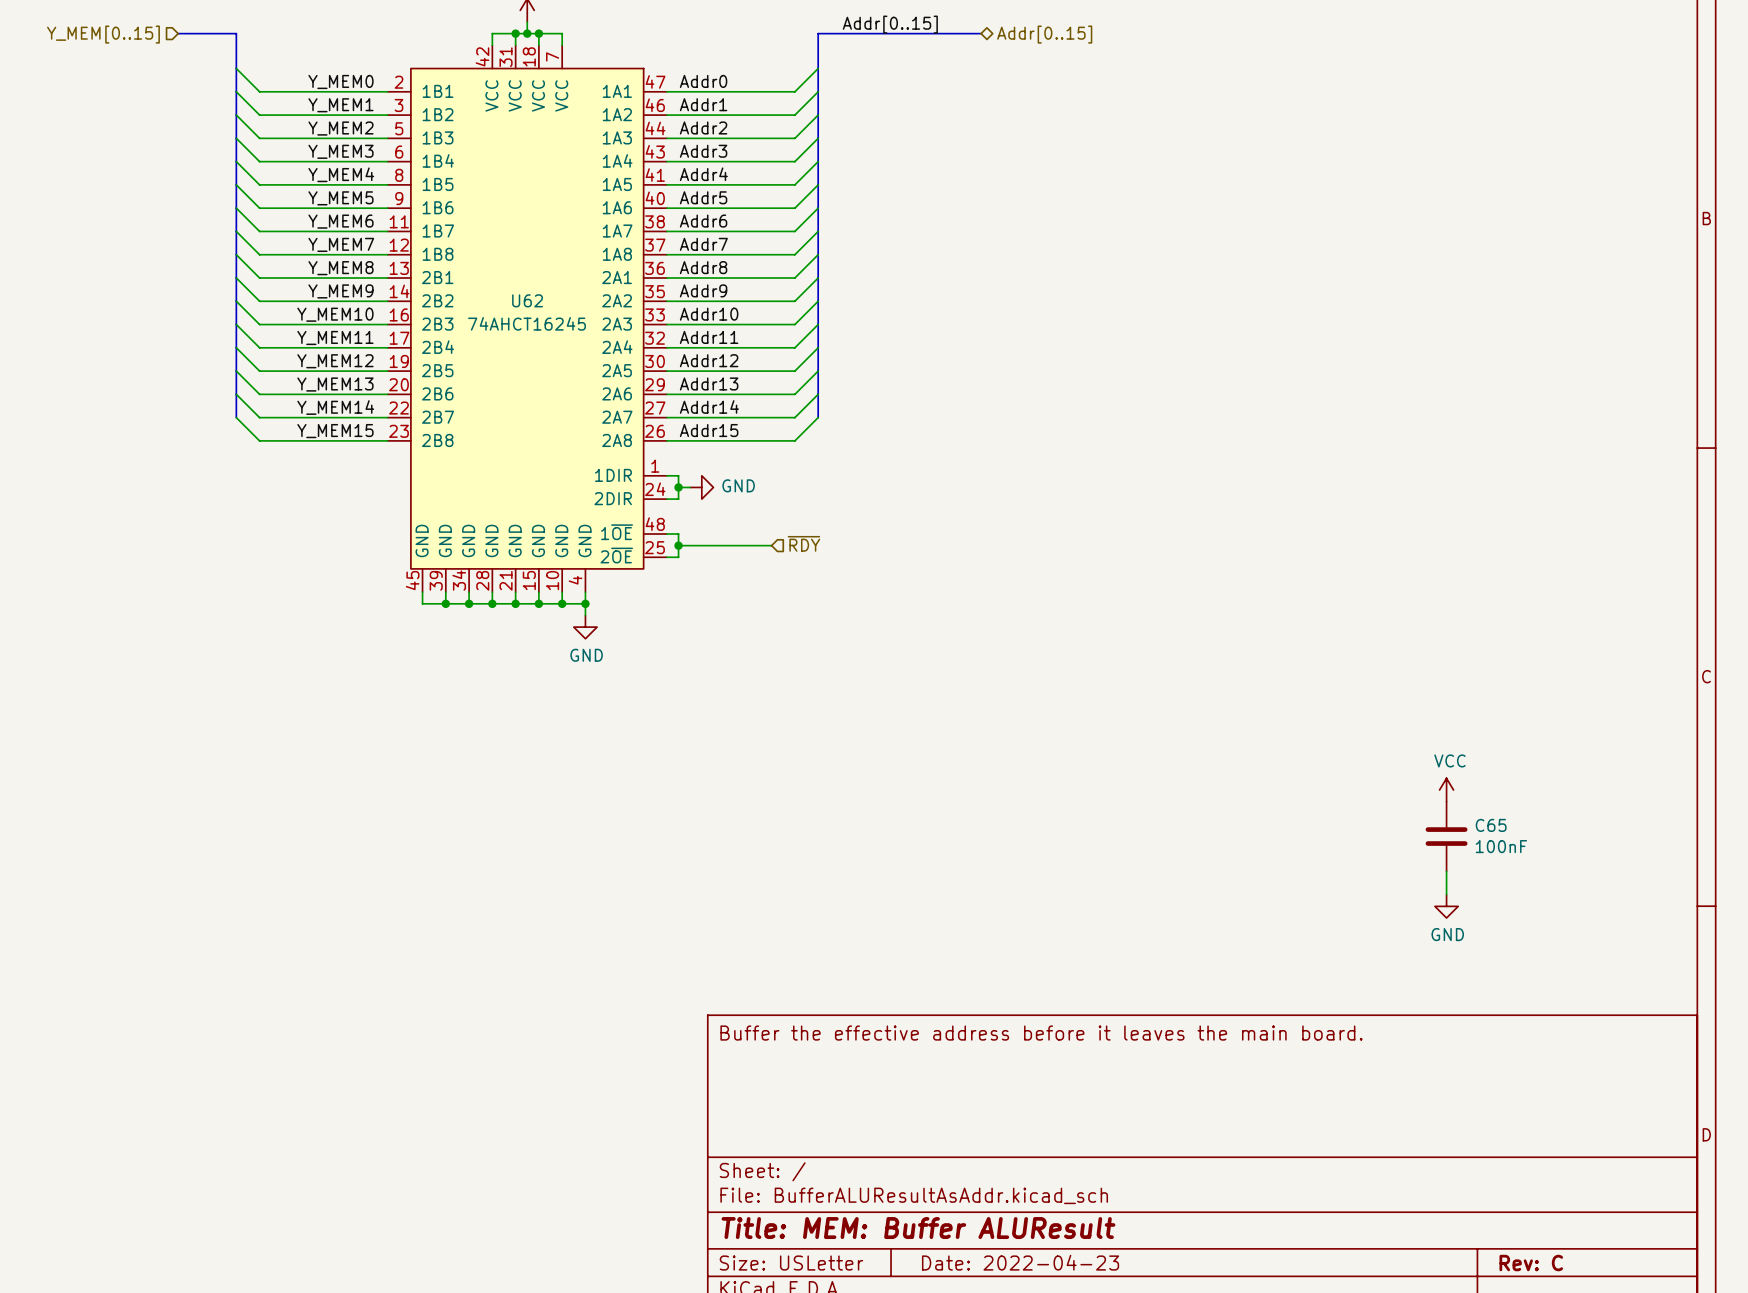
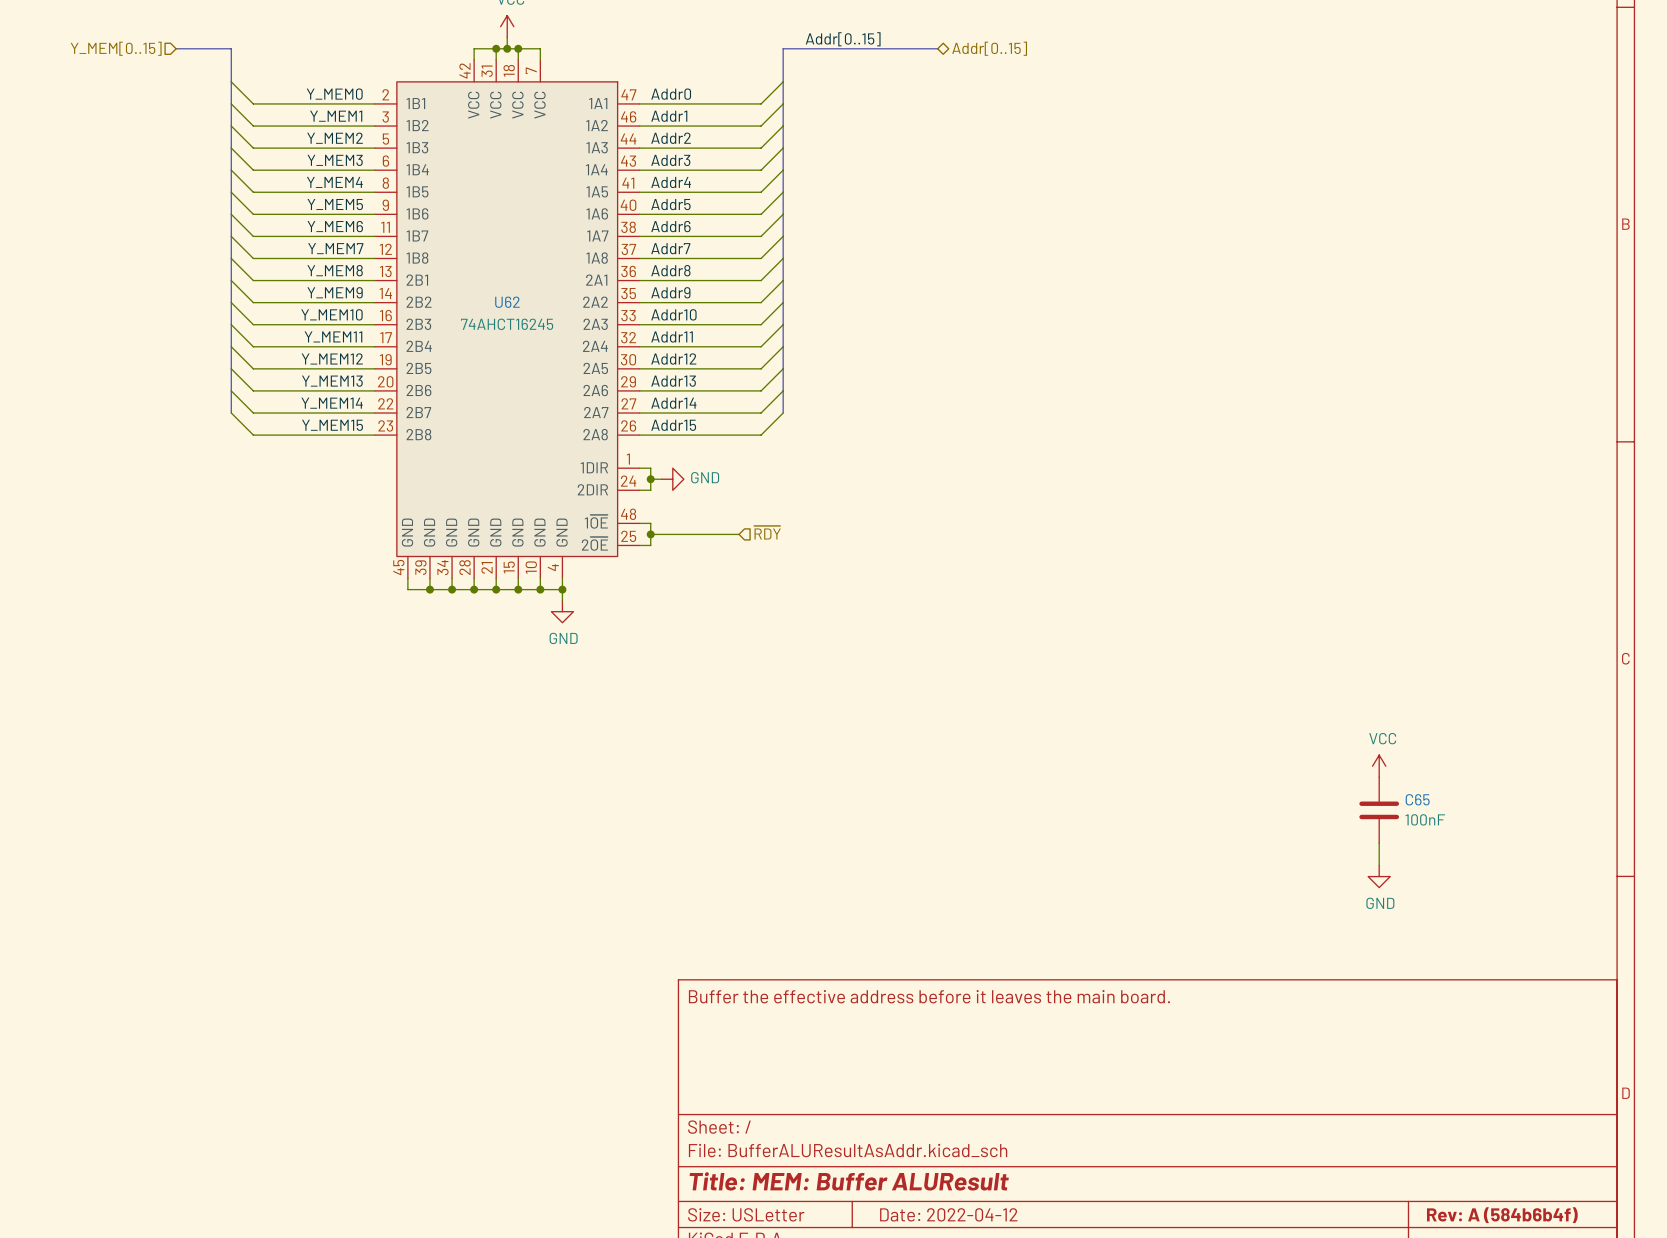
title block: Date: 2022-04-23 (1020, 1262) -> Date: 2022-04-12 (948, 1214)
title block: Rev: C (1531, 1263) -> Rev: A (584b6b4f) (1502, 1215)

